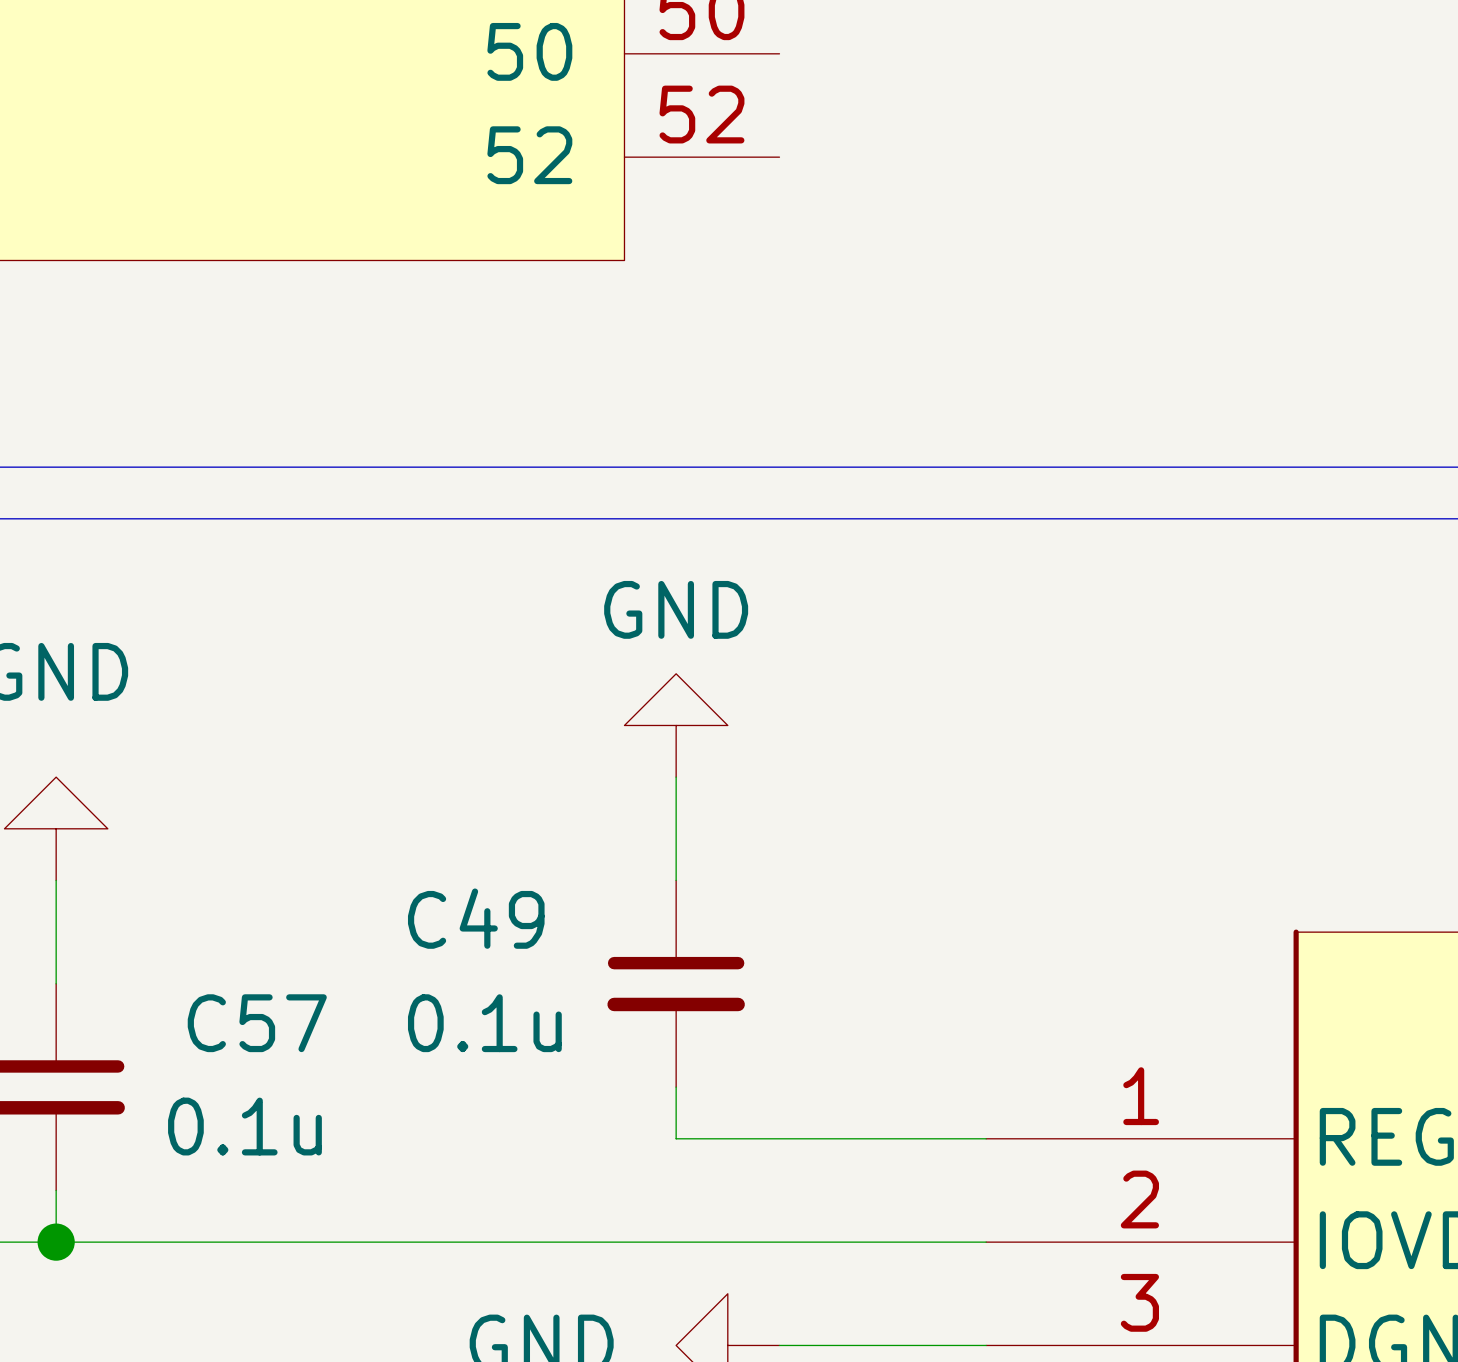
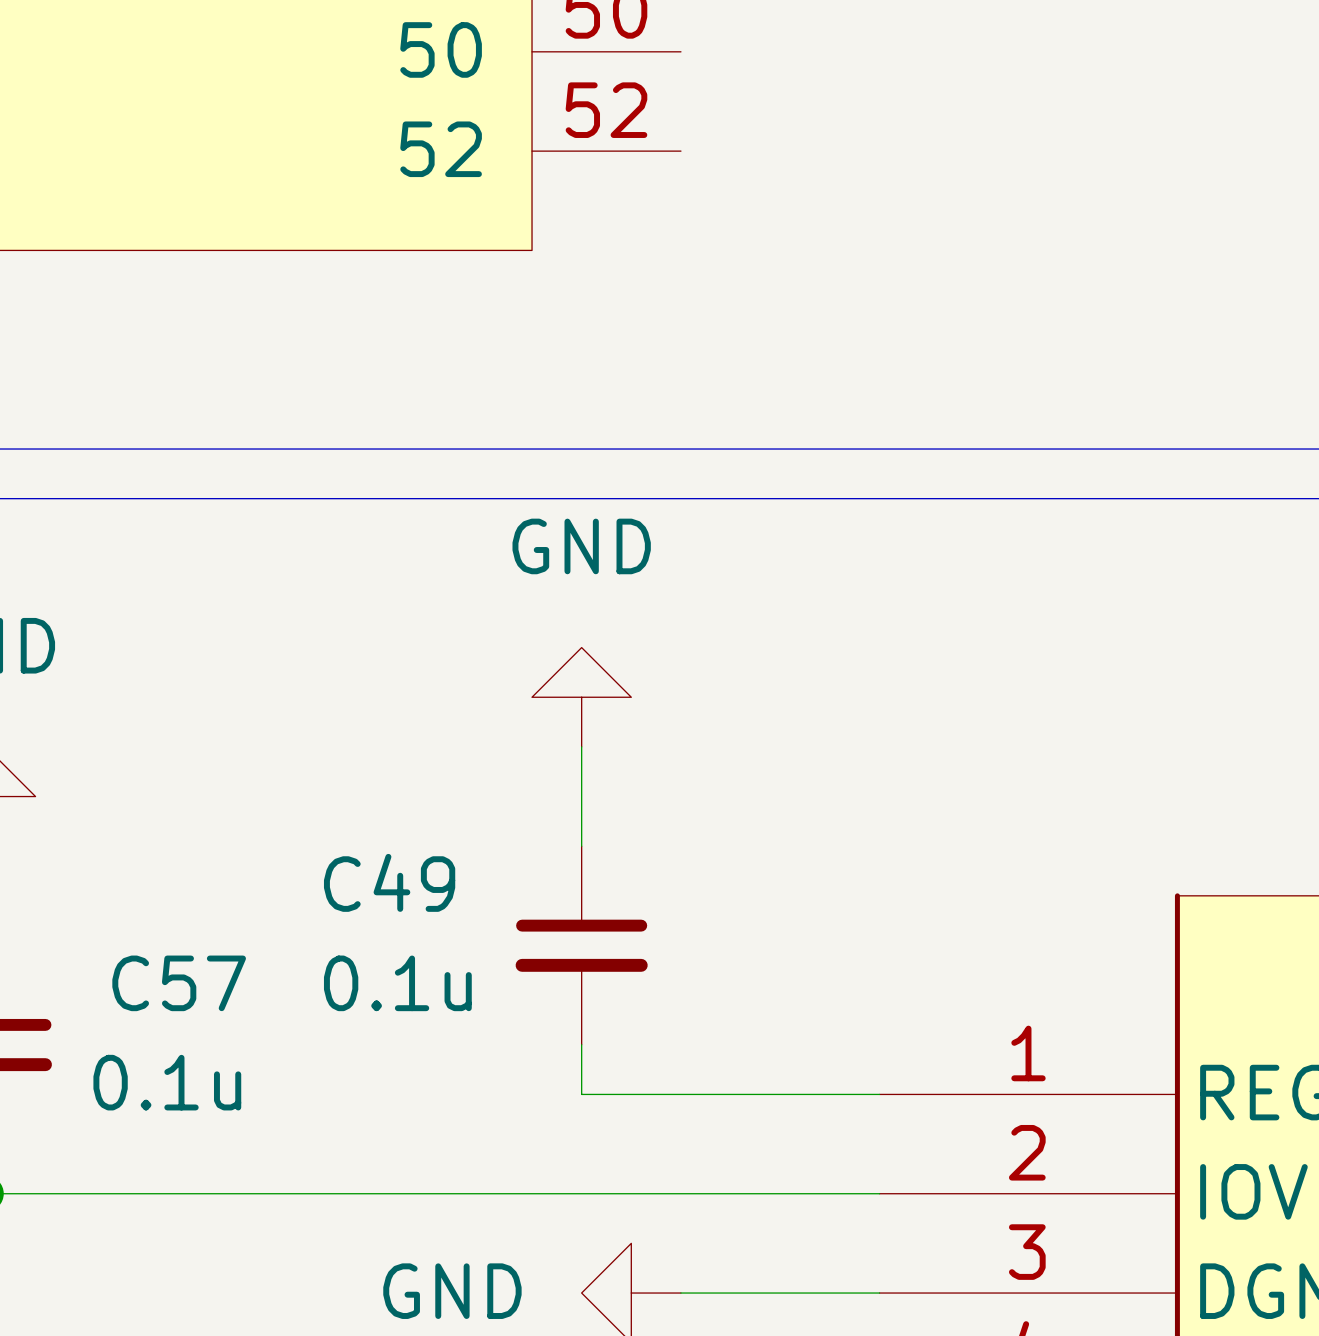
power symbol text position: GND (676, 609) -> GND (581, 546)

